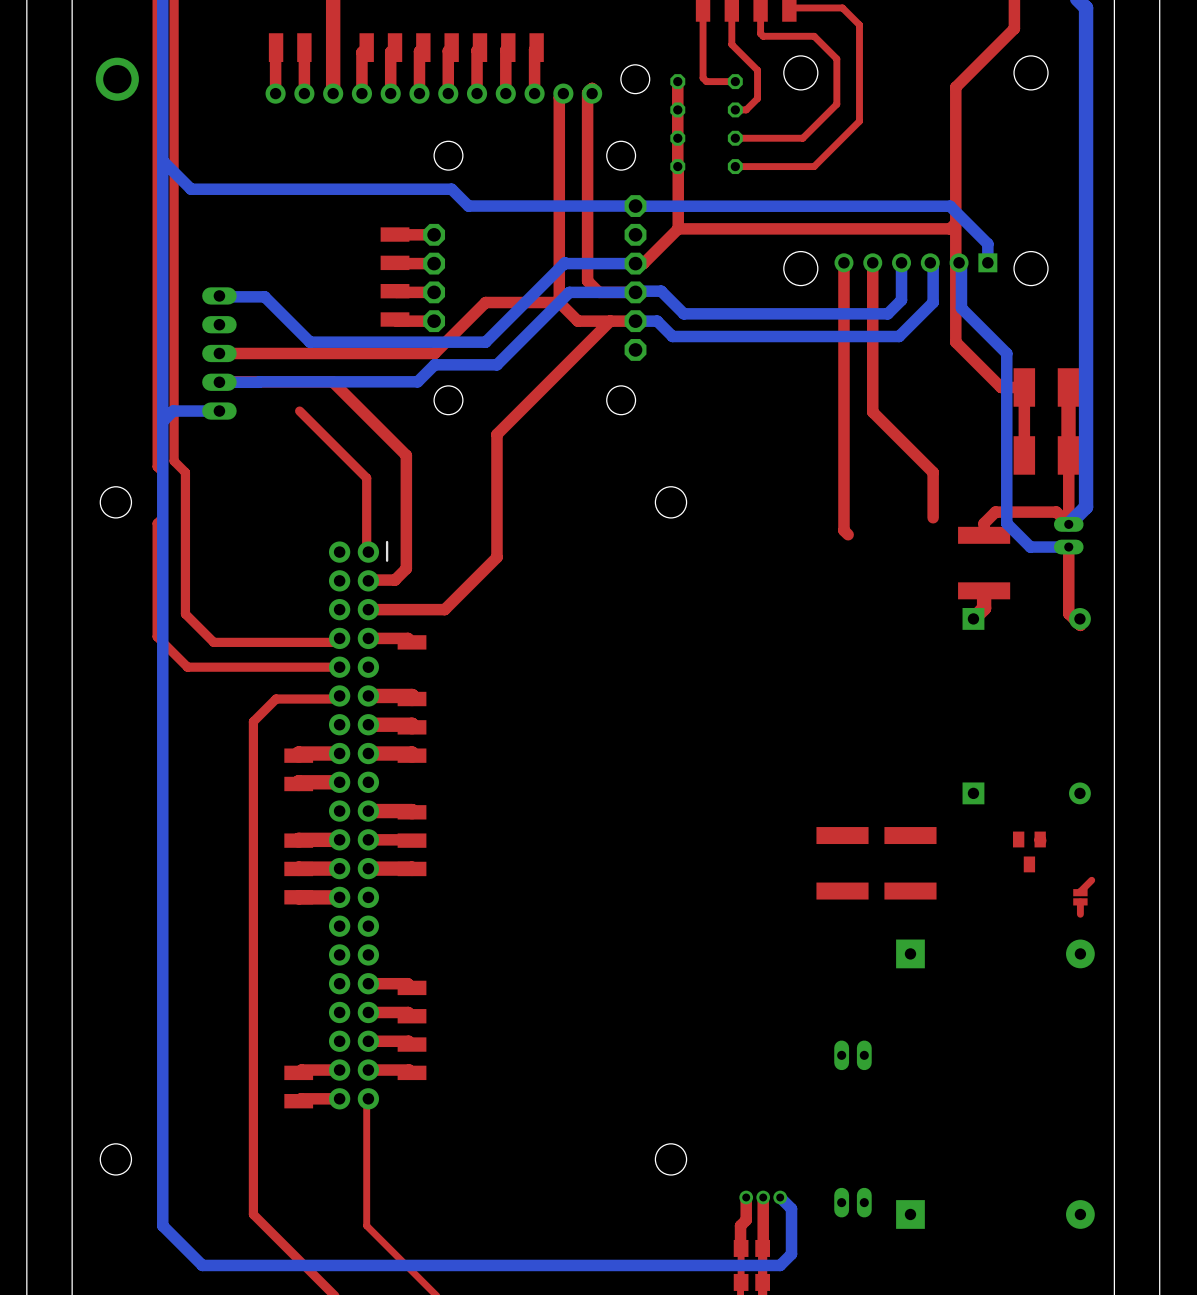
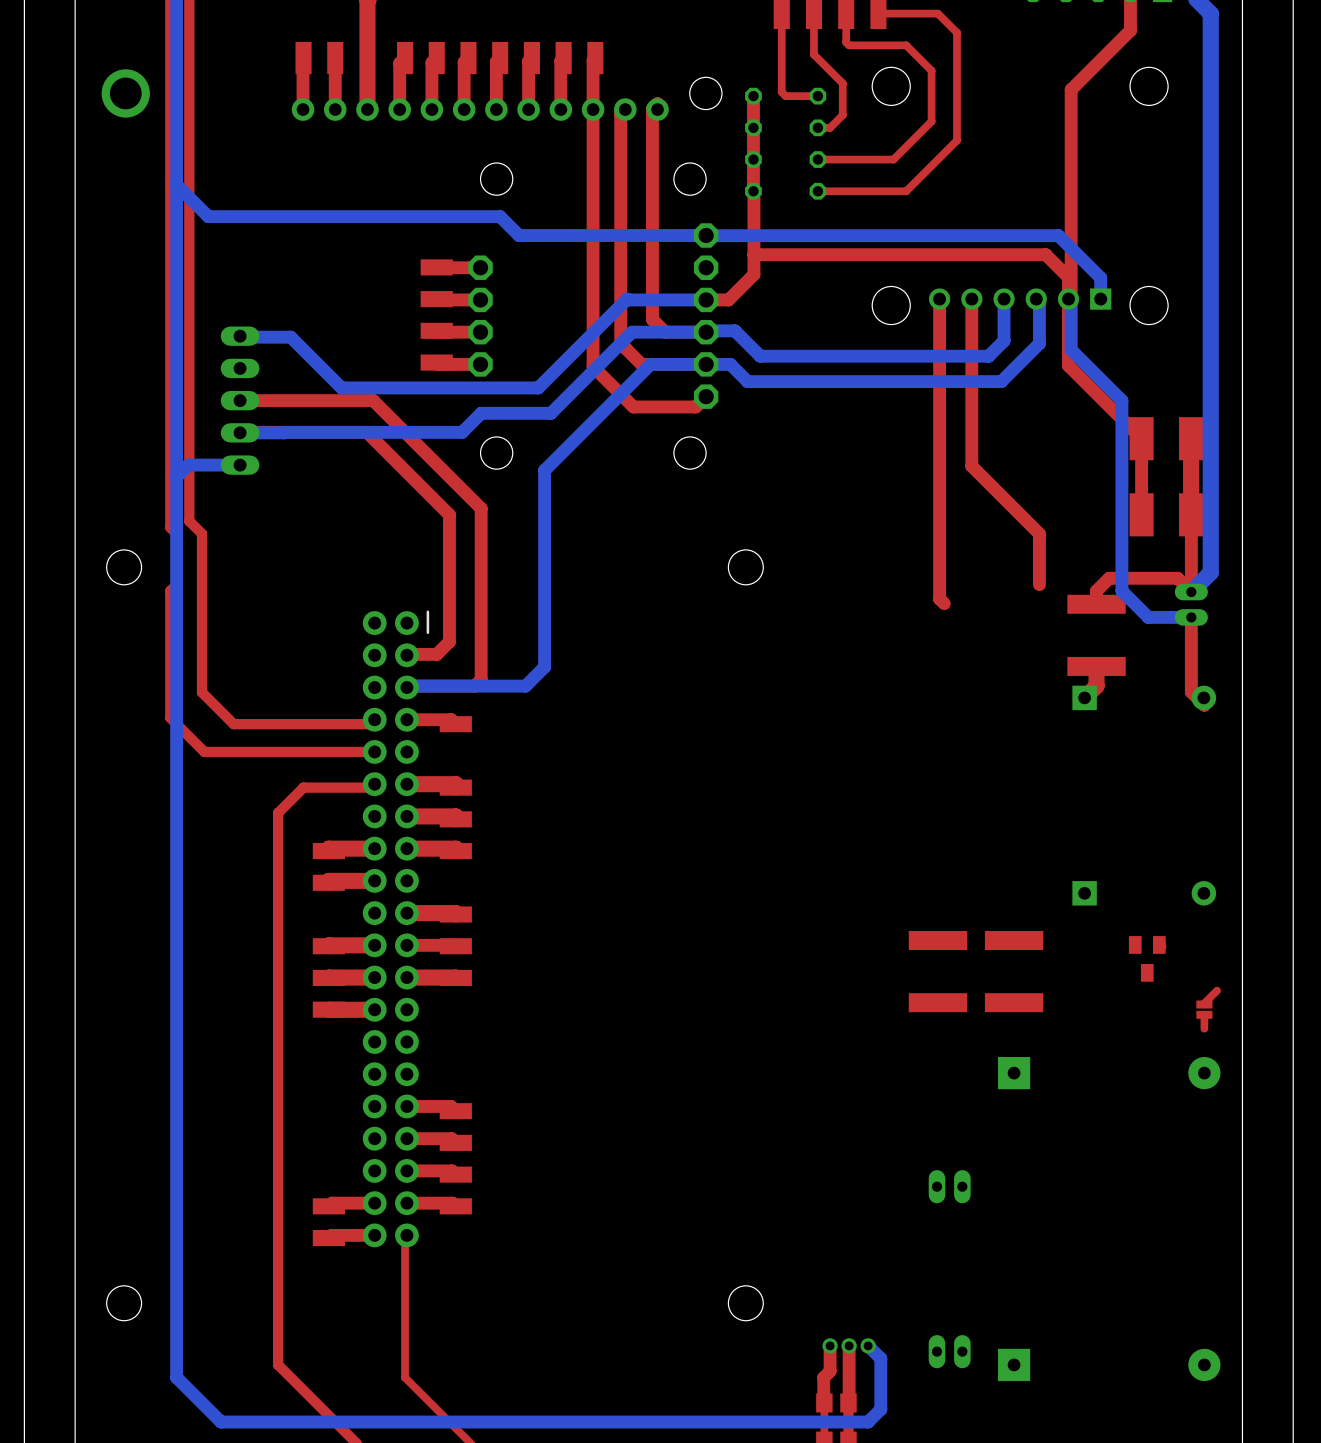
top track: (1014, 22) (1014, 28) (955, 87) (955, 259) (959, 262) (955, 266) (955, 342) (1001, 387) (1024, 387) -> (1130, 30) (1071, 89) (1071, 296) (1068, 299)
top track: none -> (593, 109) (593, 366) (633, 406) (695, 406) (706, 396)
top track: none -> (753, 254) (1045, 254) (1068, 277) (1068, 365) (1141, 438)
top track: (955, 223) (950, 228) (678, 228) (643, 263) -> (753, 261) (753, 274) (728, 299) (715, 299)
top track: (559, 302) (485, 302) (434, 353) (338, 353) -> none
top track: (610, 321) (496, 434) (496, 557) (444, 609) (368, 609) -> (373, 400) (481, 508) (481, 679) (474, 686) (406, 687)
bottom track: none -> (706, 364) (650, 364) (544, 470) (544, 667) (525, 686) (406, 687)
top track: (299, 411) (366, 478) (366, 550) (368, 552) -> none

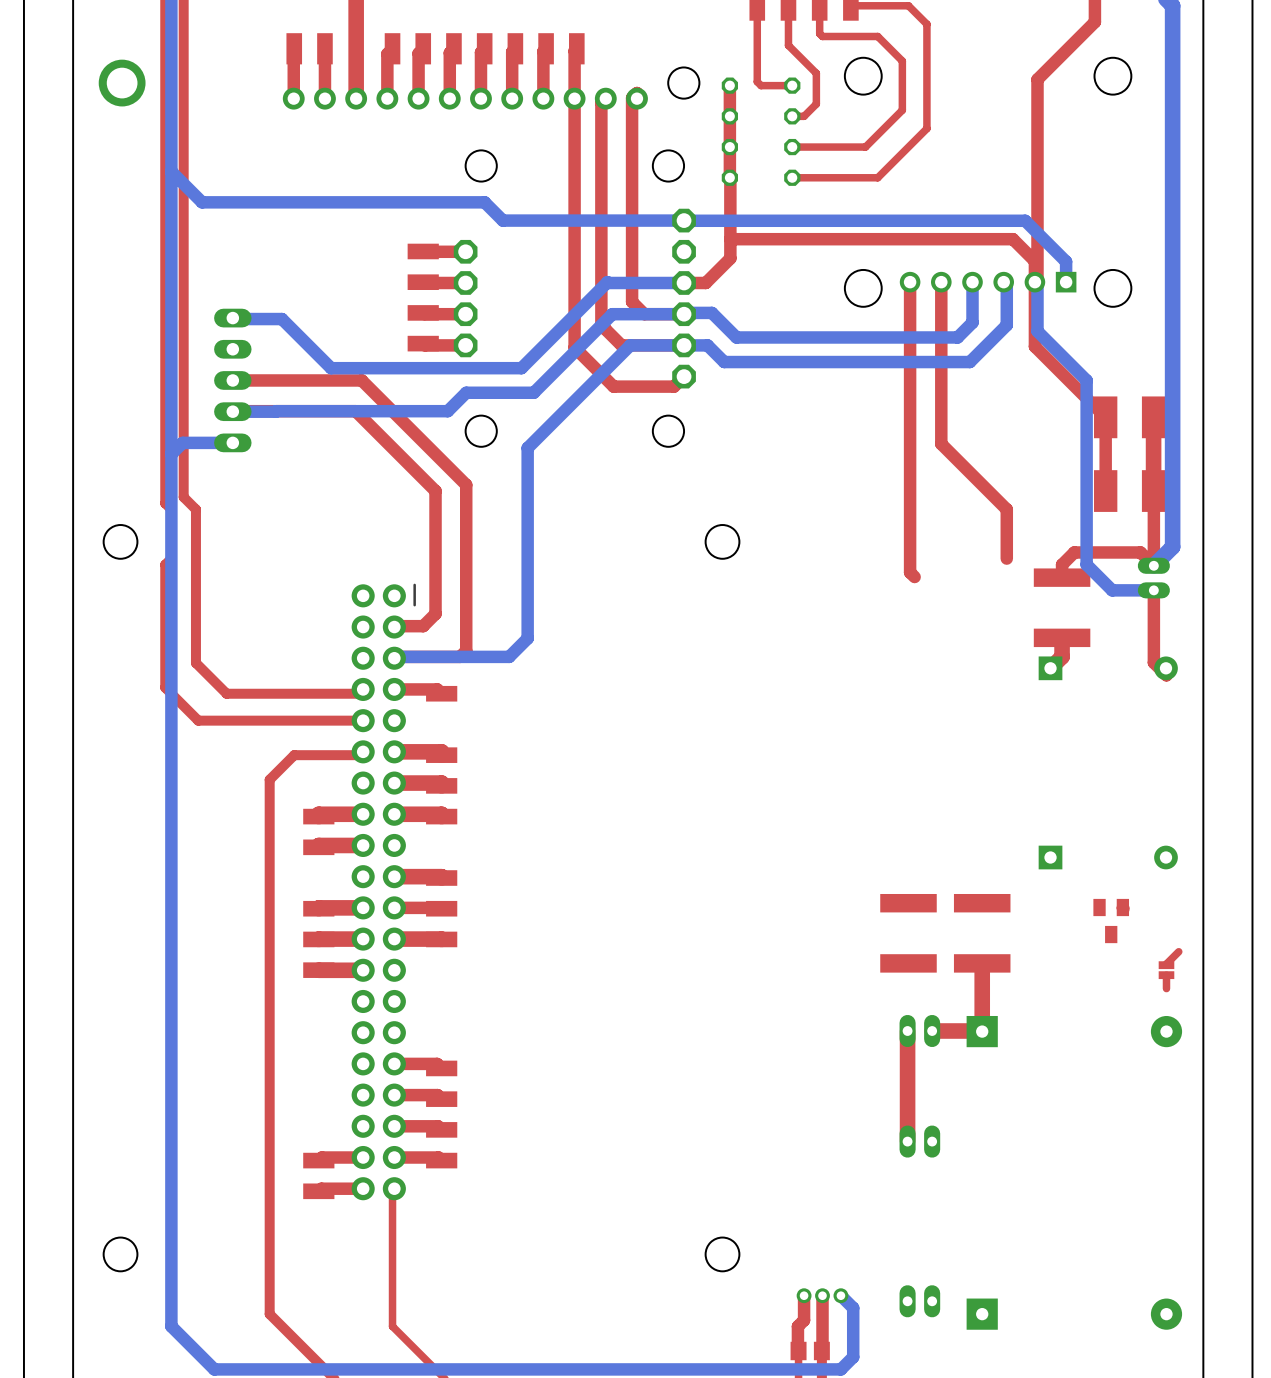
top track: none -> (982, 963) (982, 1031) (932, 1031)
top track: none -> (907, 1031) (907, 1141)
part: none -> (919, 1031)

